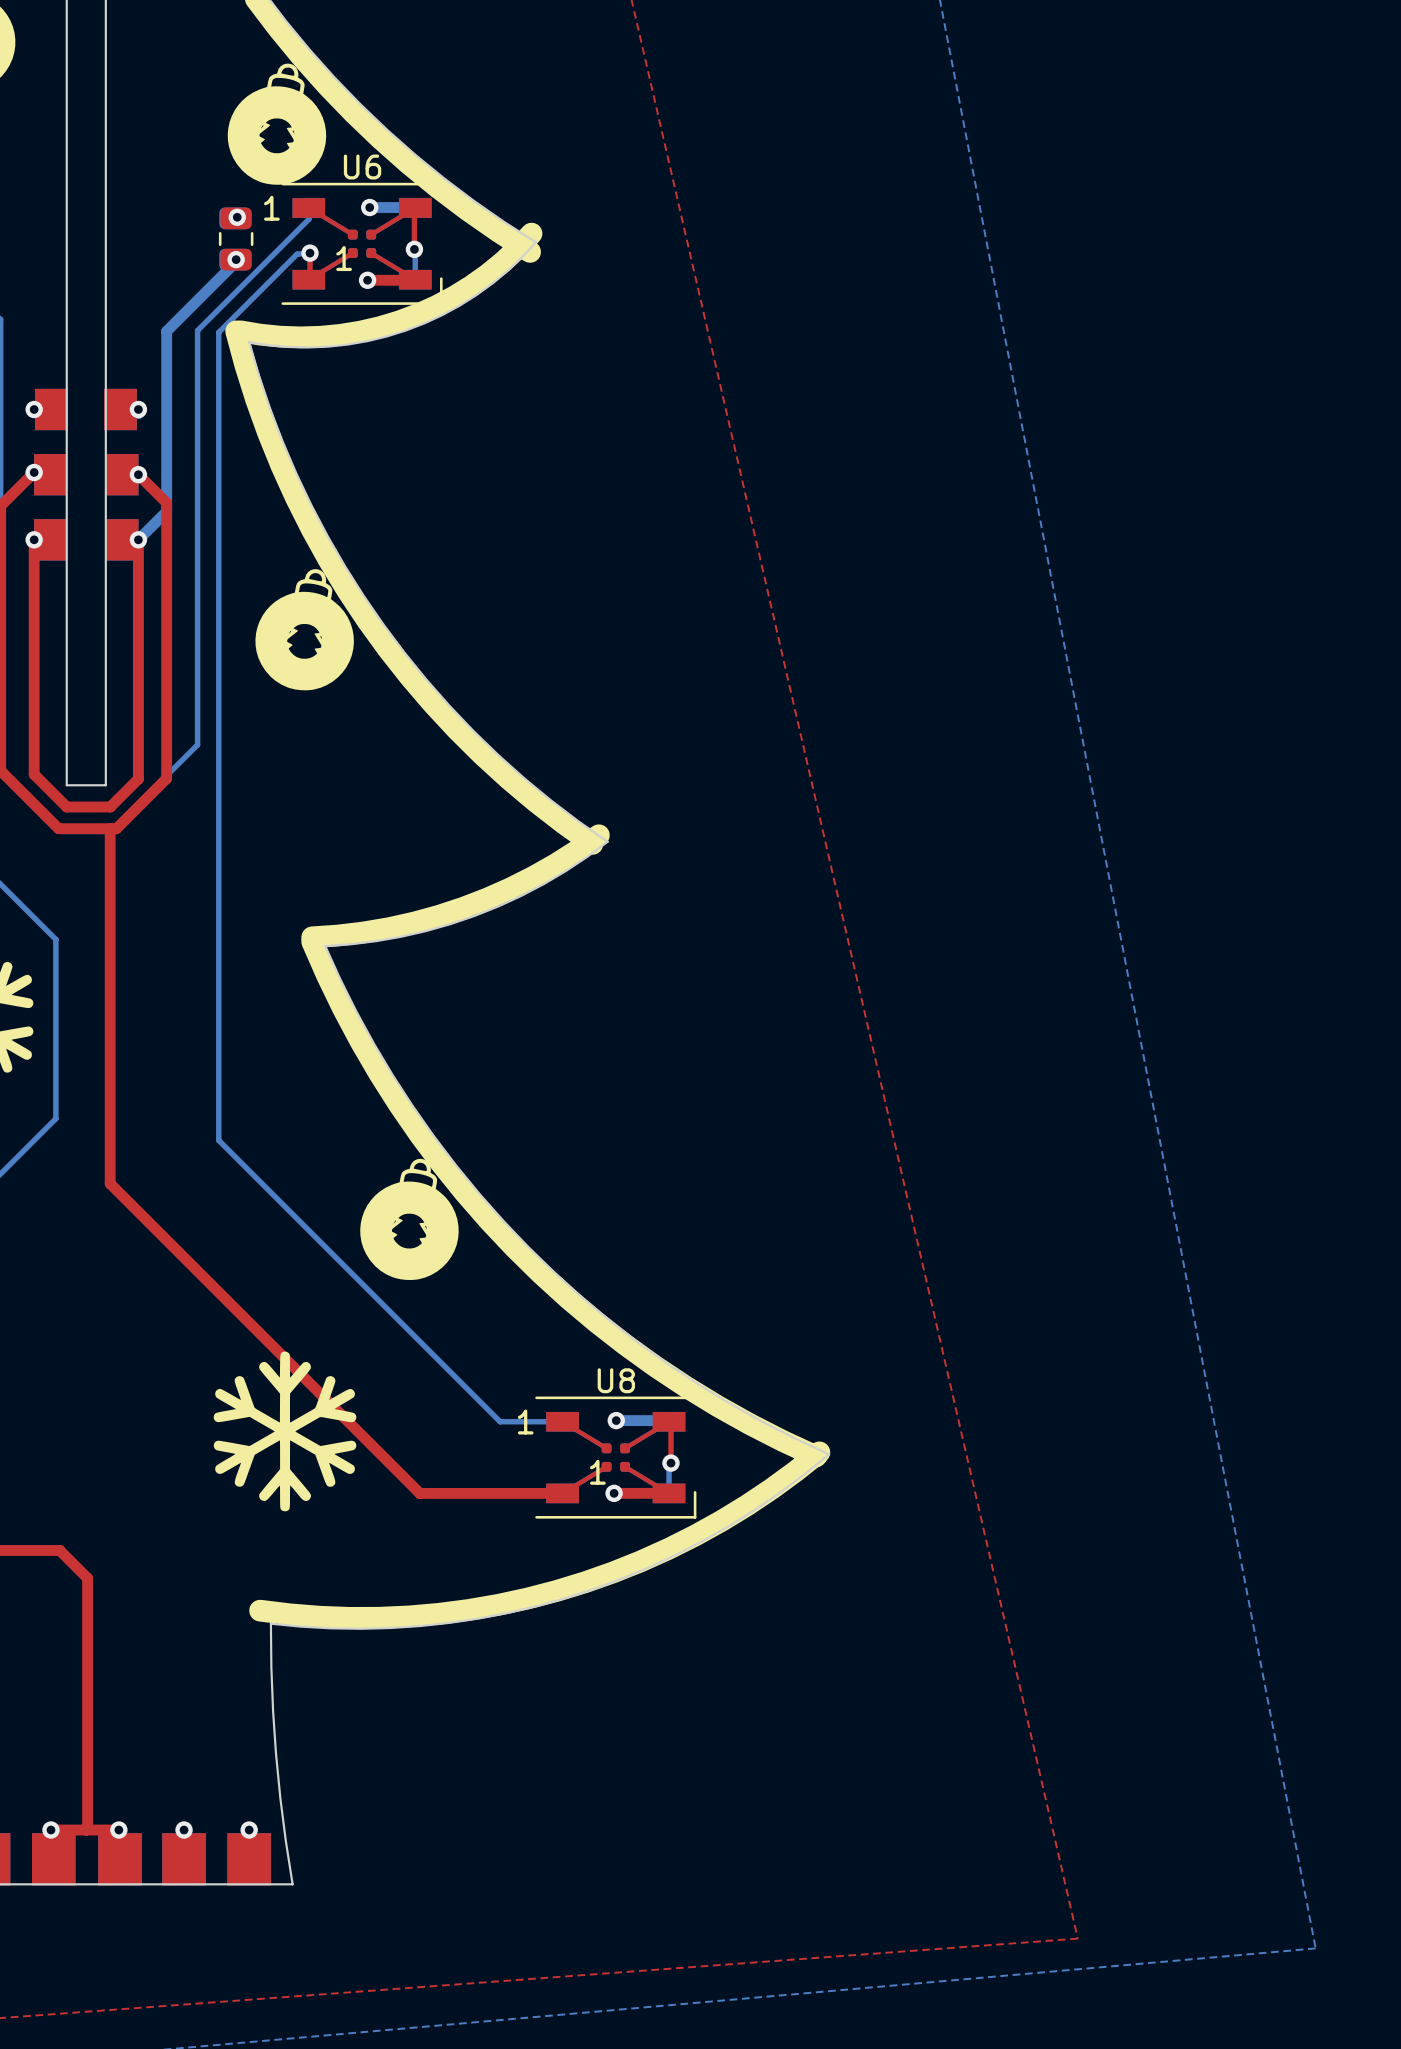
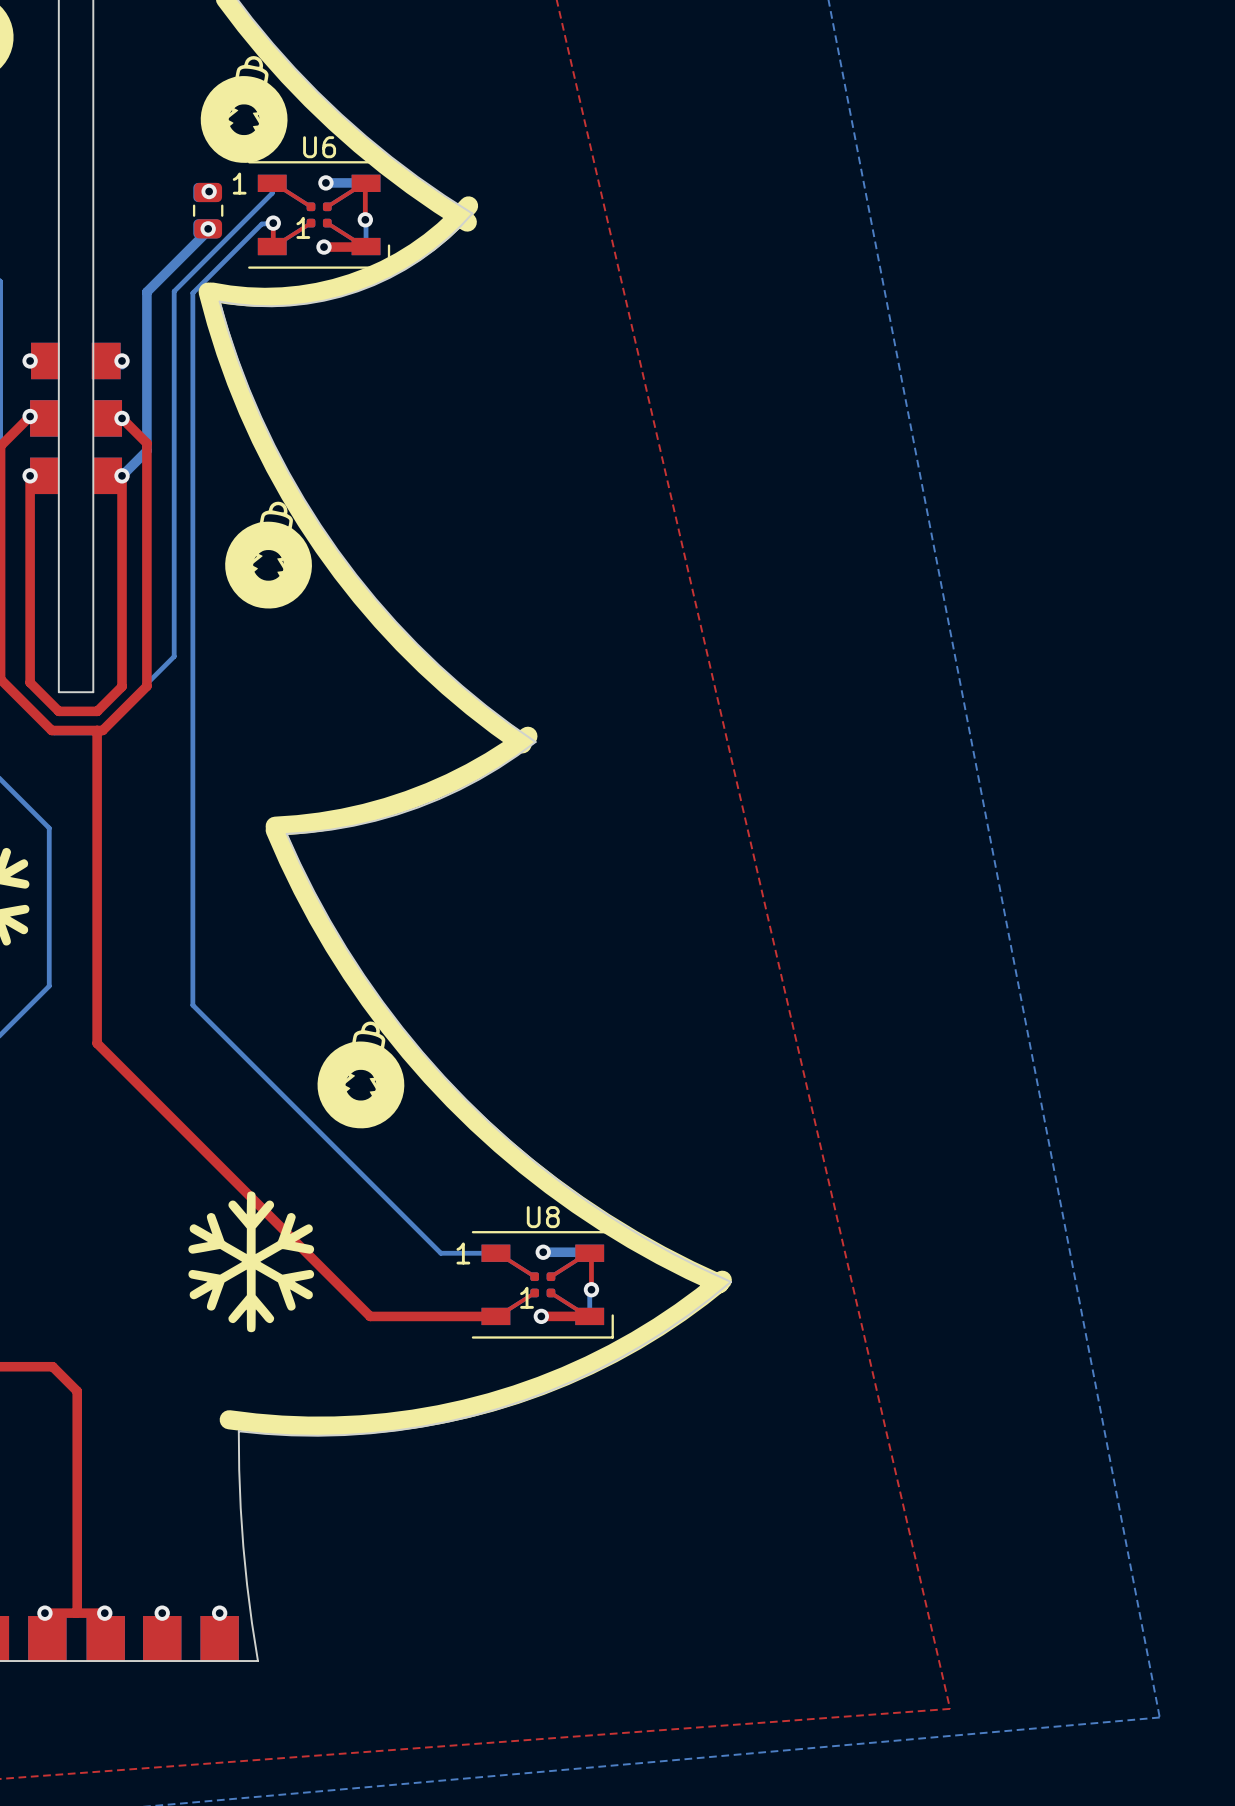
U6 footprint: [281, 182, 443, 305] -> [248, 161, 391, 269]
U8 footprint: [535, 1396, 697, 1519] -> [471, 1231, 614, 1339]

